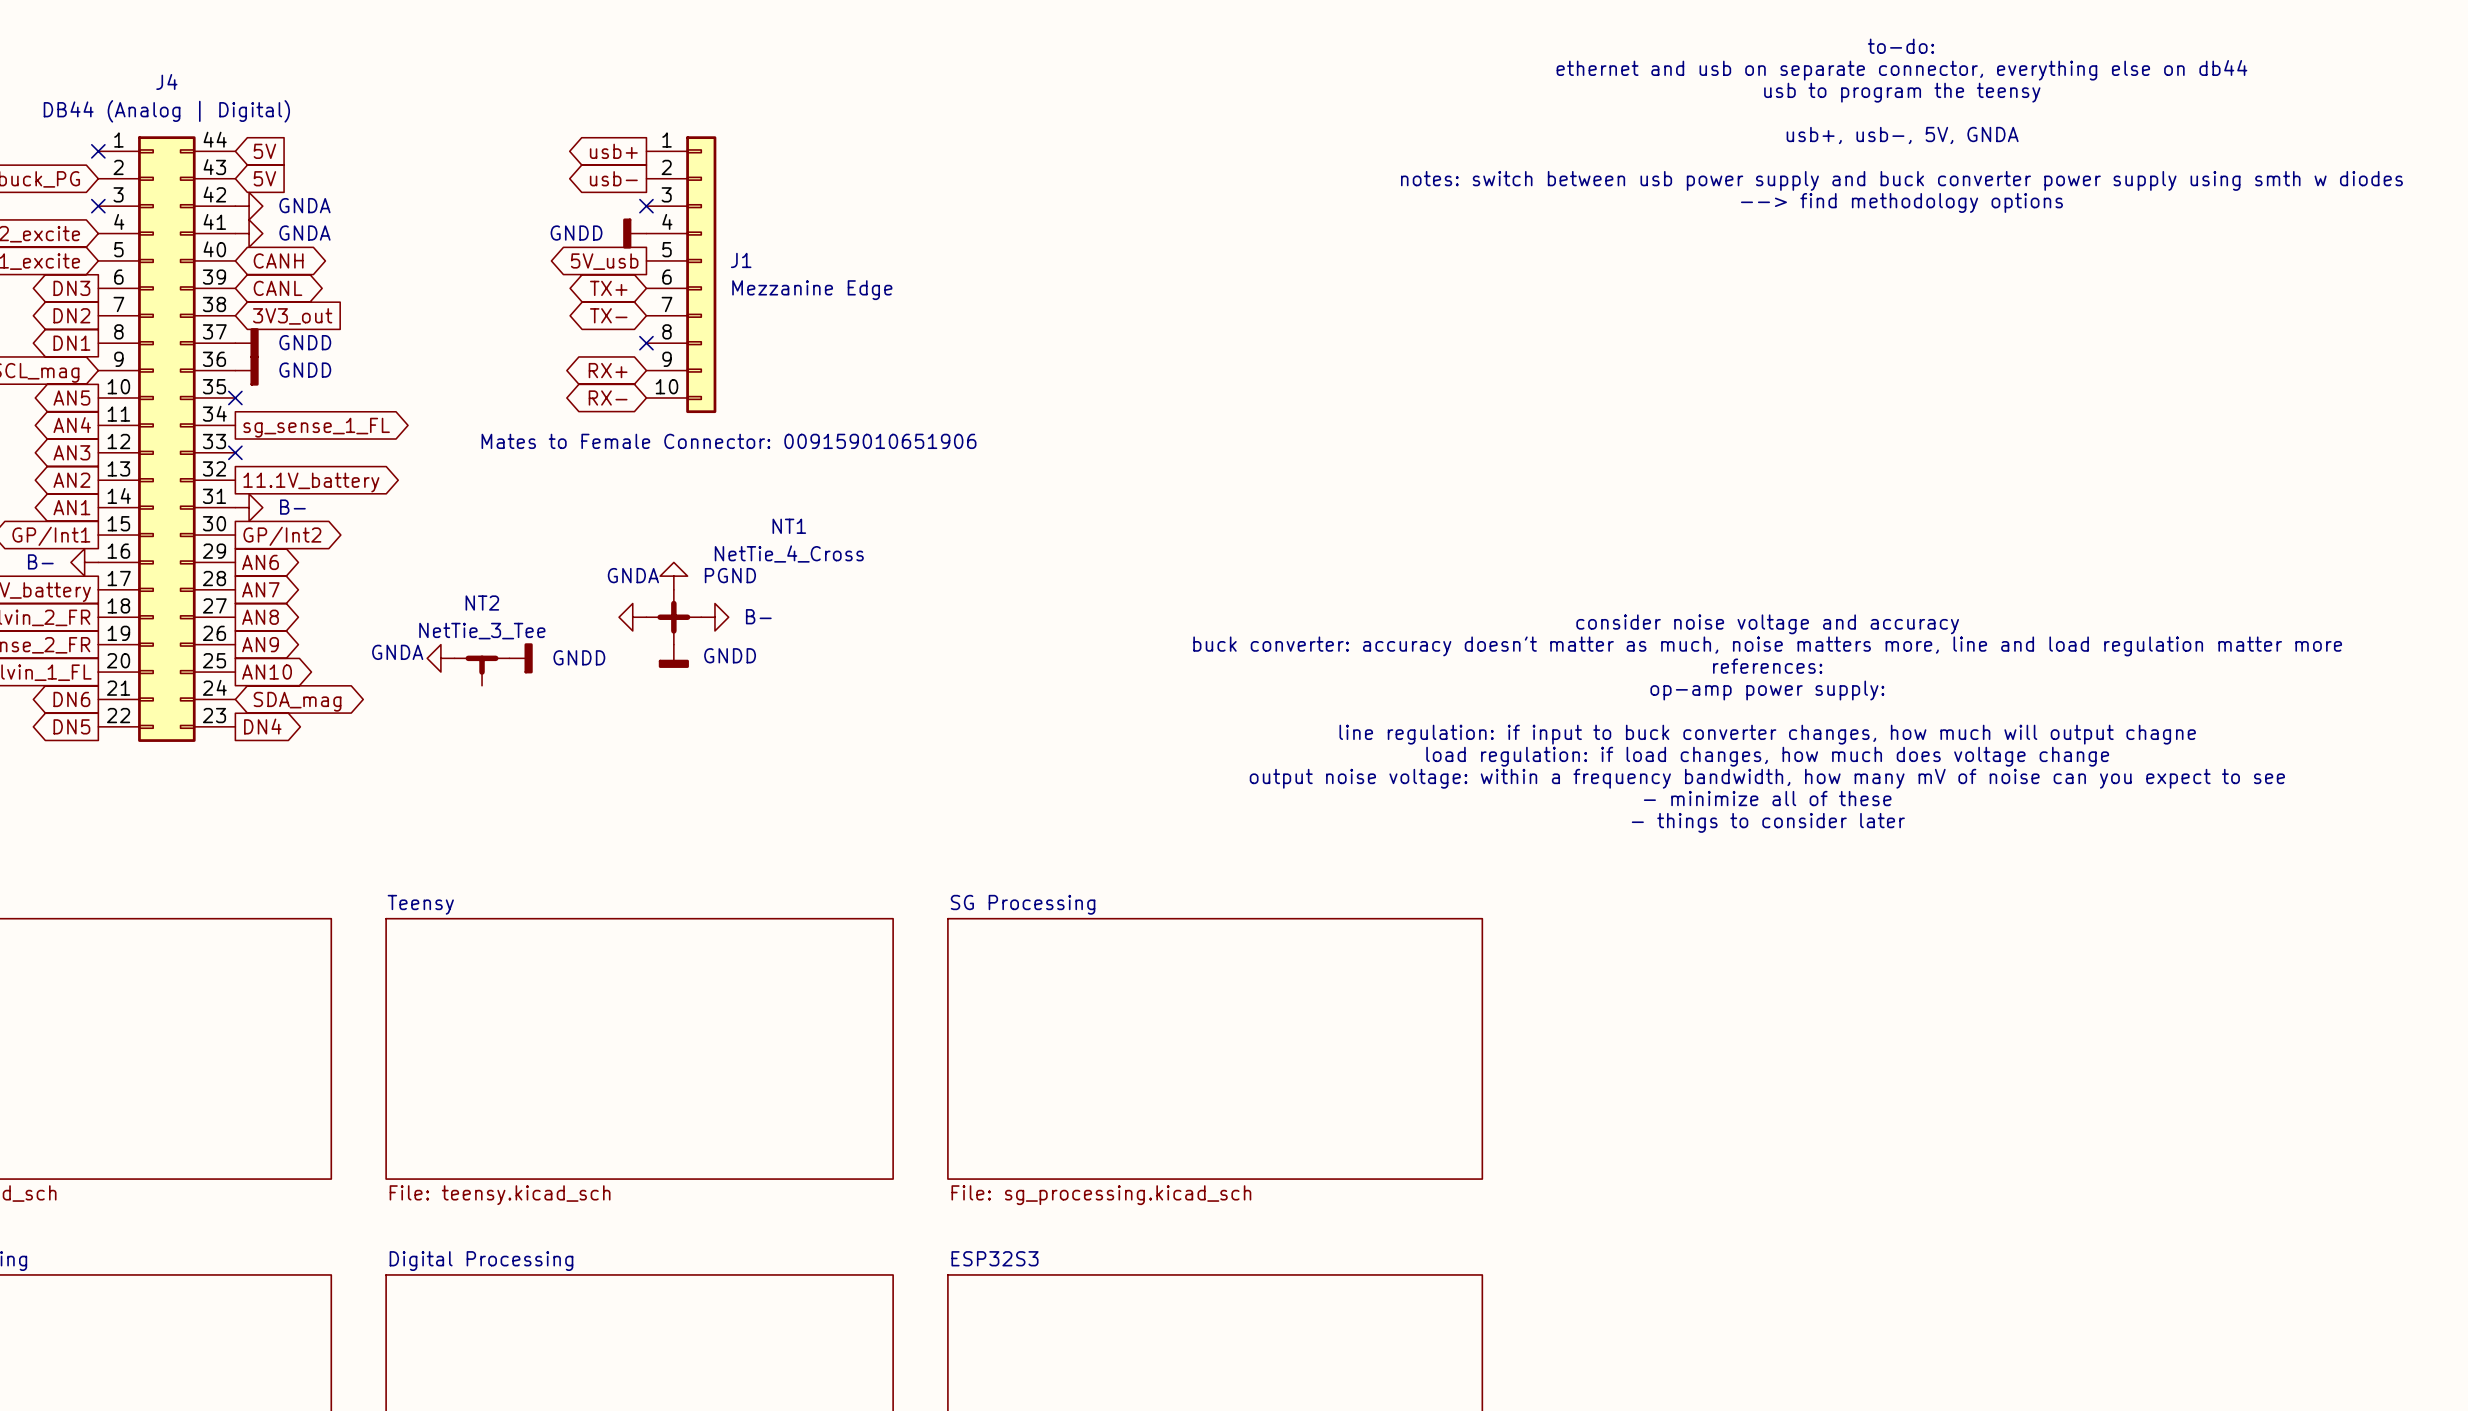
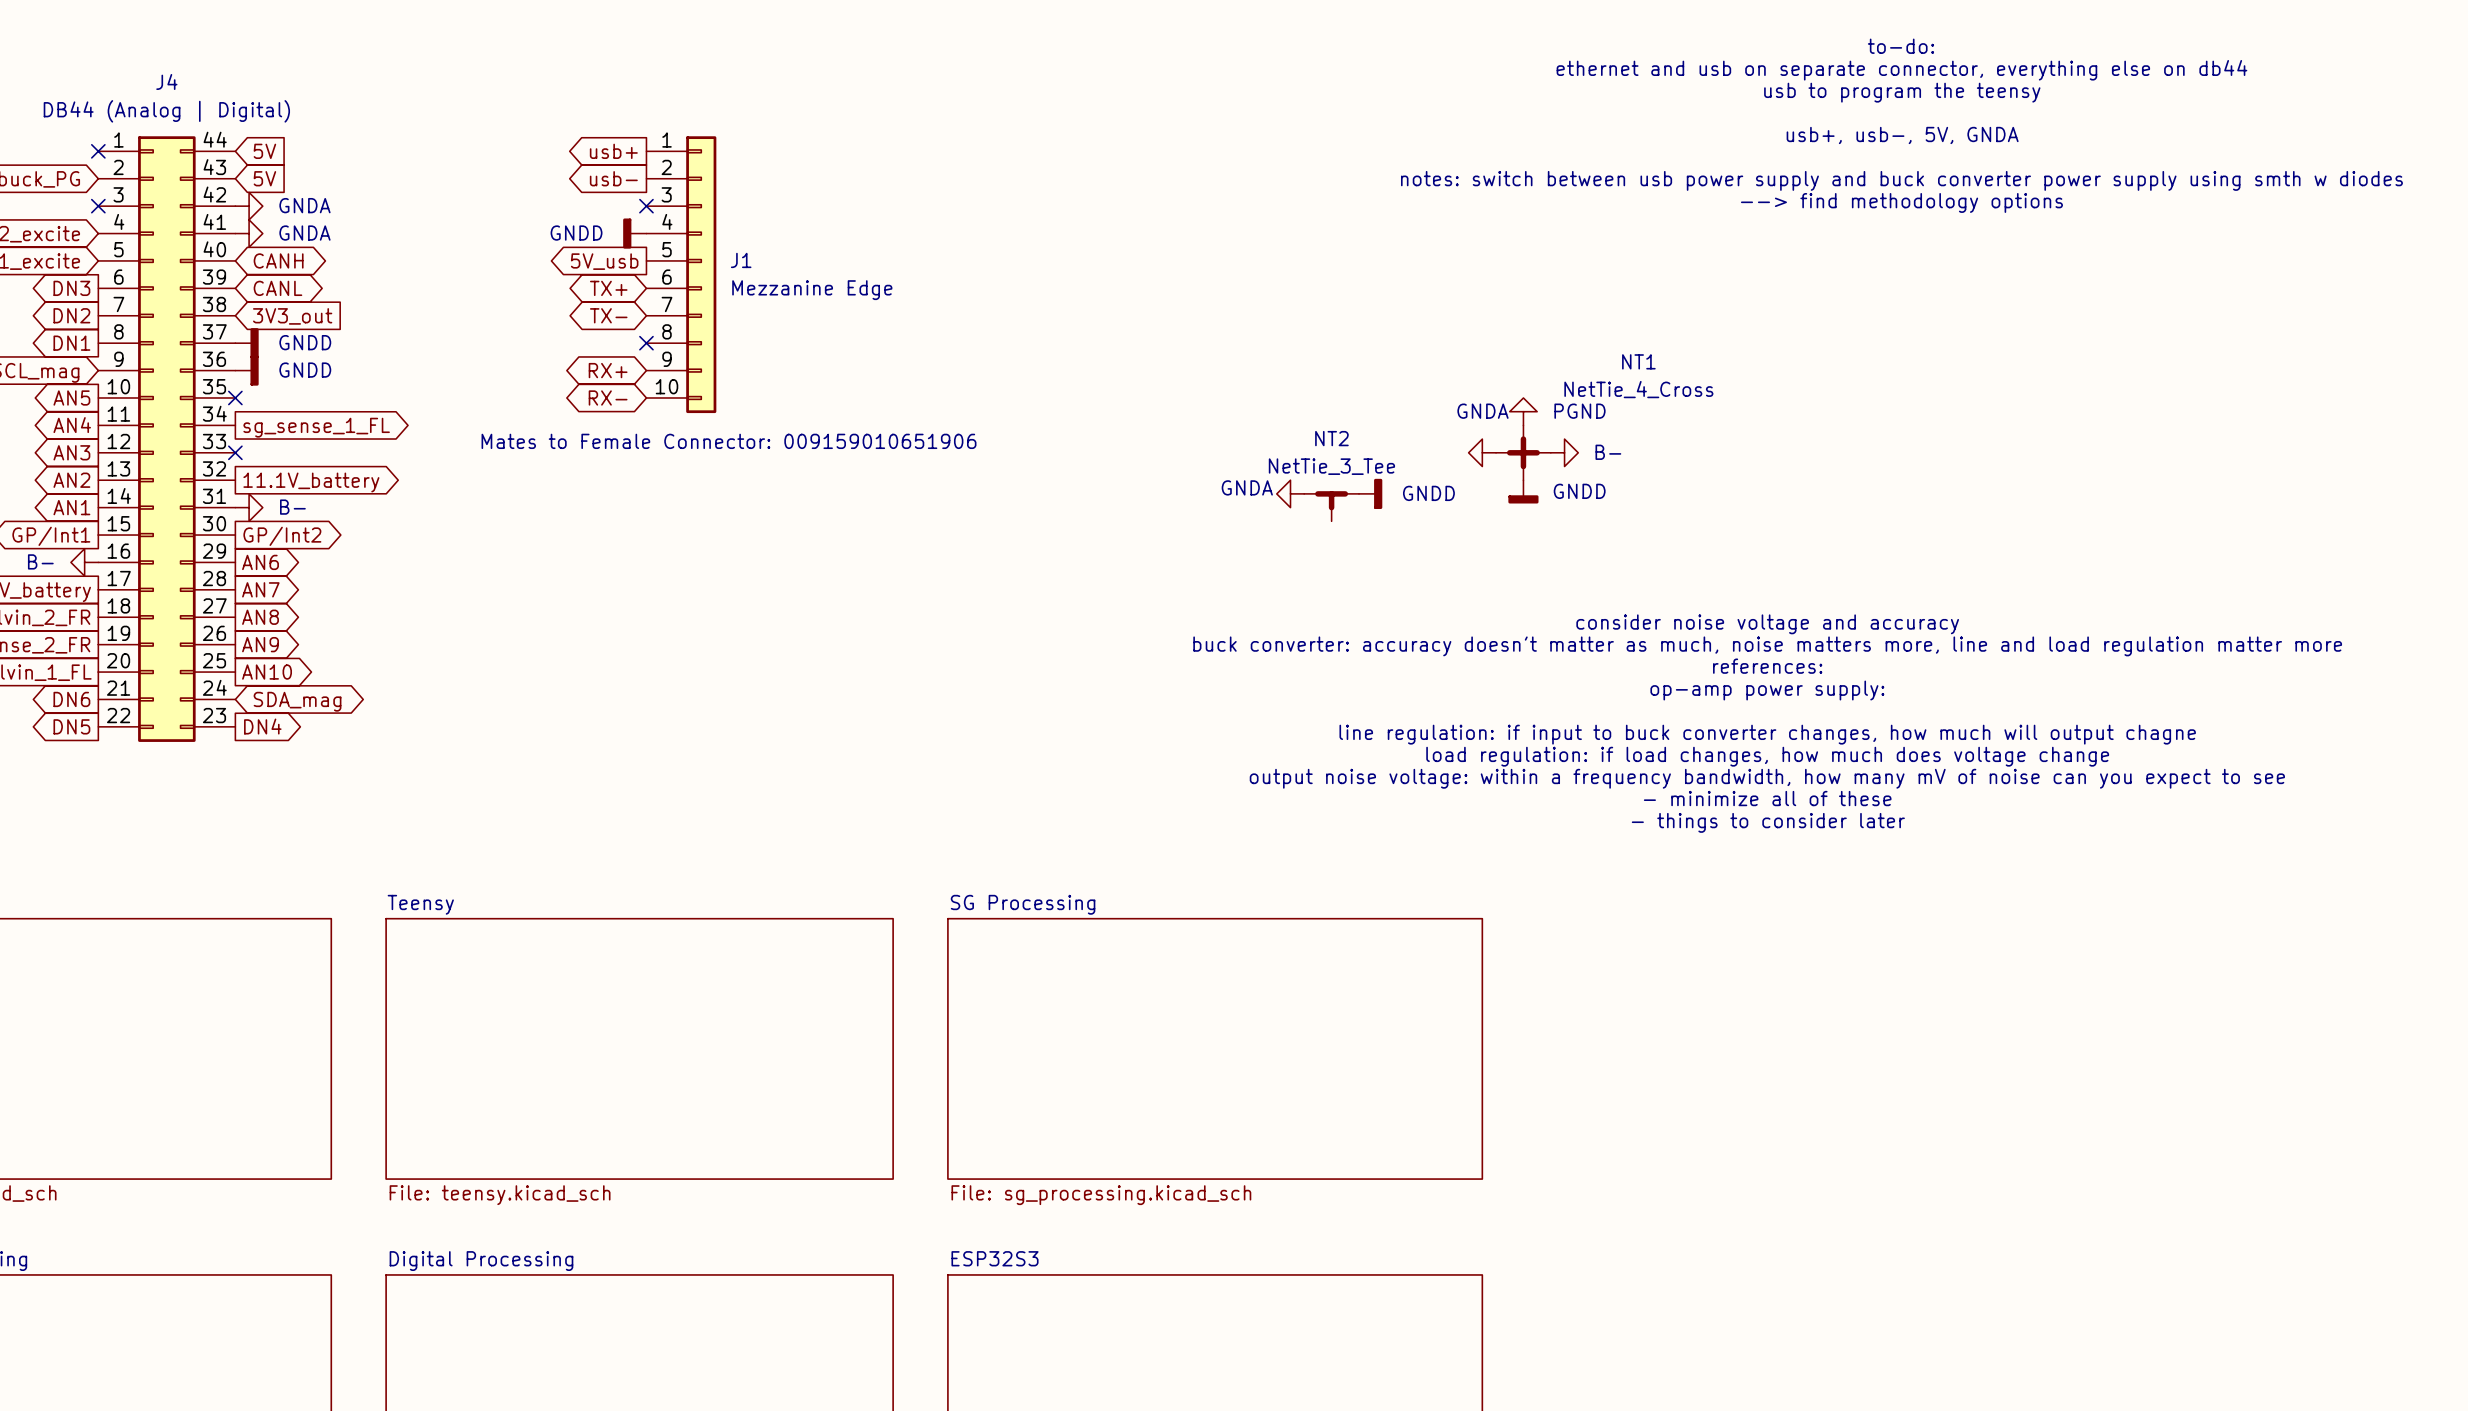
power symbol: none -> PGND (1523, 411)
power symbol: none -> GNDA (1482, 452)
power symbol: none -> B- (1564, 452)
power symbol: none -> GNDD (1523, 491)
power symbol: none -> GNDA (1290, 493)
power symbol: none -> GNDD (1370, 493)
power symbol: PGND (673, 576) -> none
power symbol: GNDA (632, 617) -> none
NT1 position: (673, 617) -> (1523, 452)
power symbol: B- (714, 617) -> none
power symbol: GNDD (673, 656) -> none
power symbol: GNDA (440, 658) -> none
power symbol: GNDD (521, 658) -> none
NT2 position: (482, 671) -> (1331, 506)

